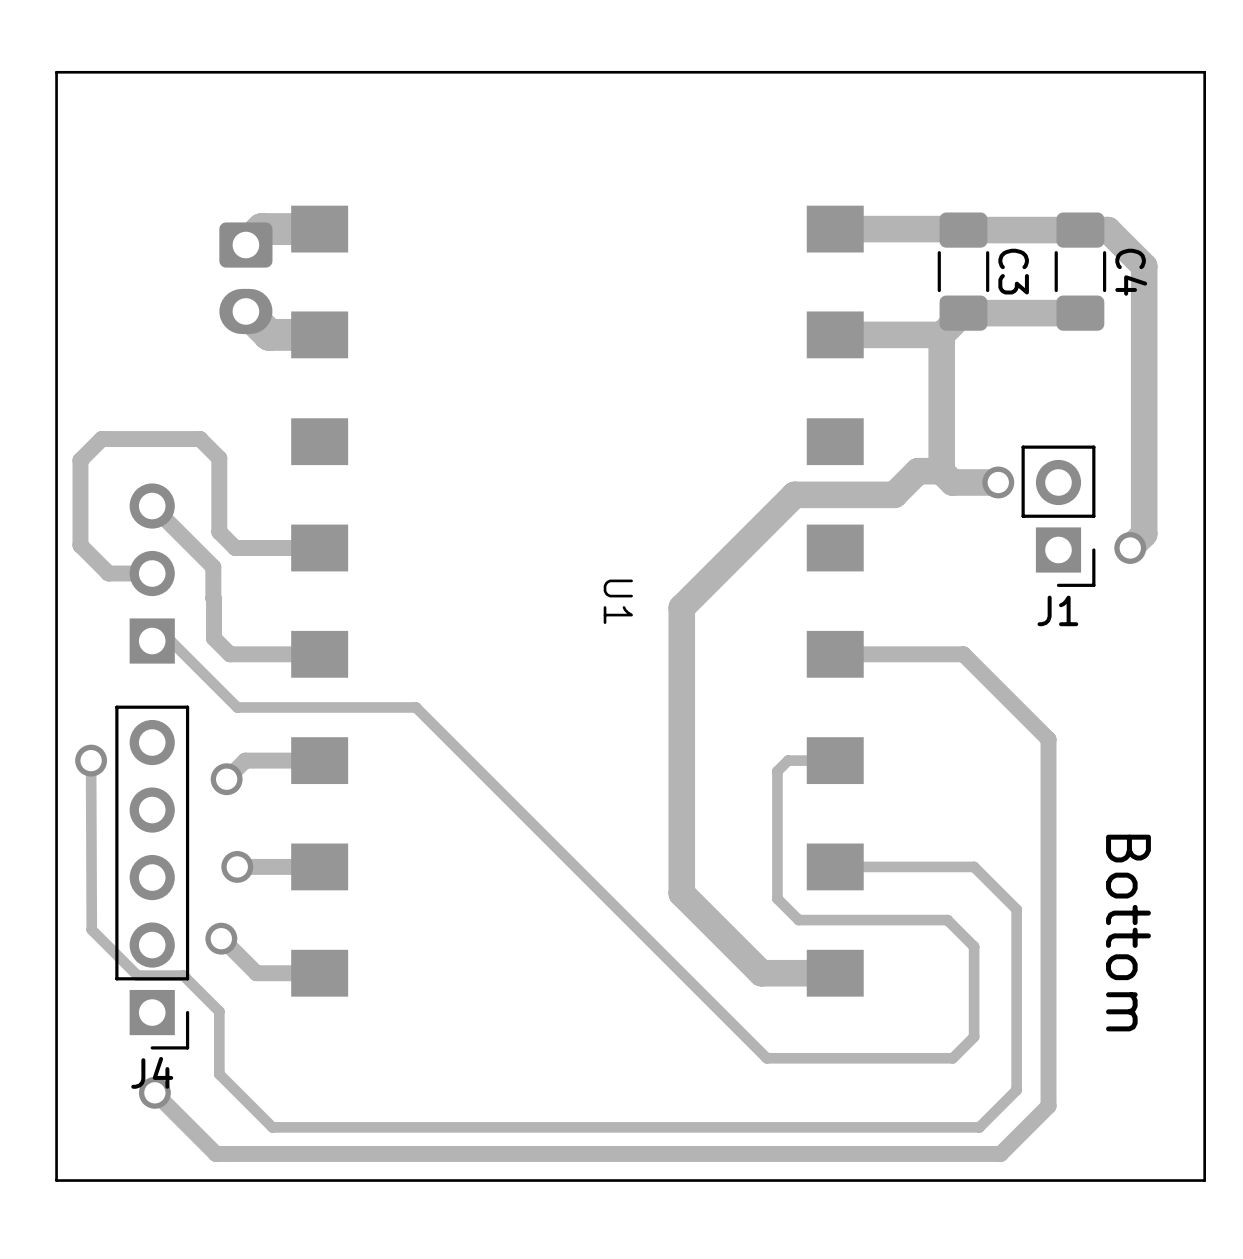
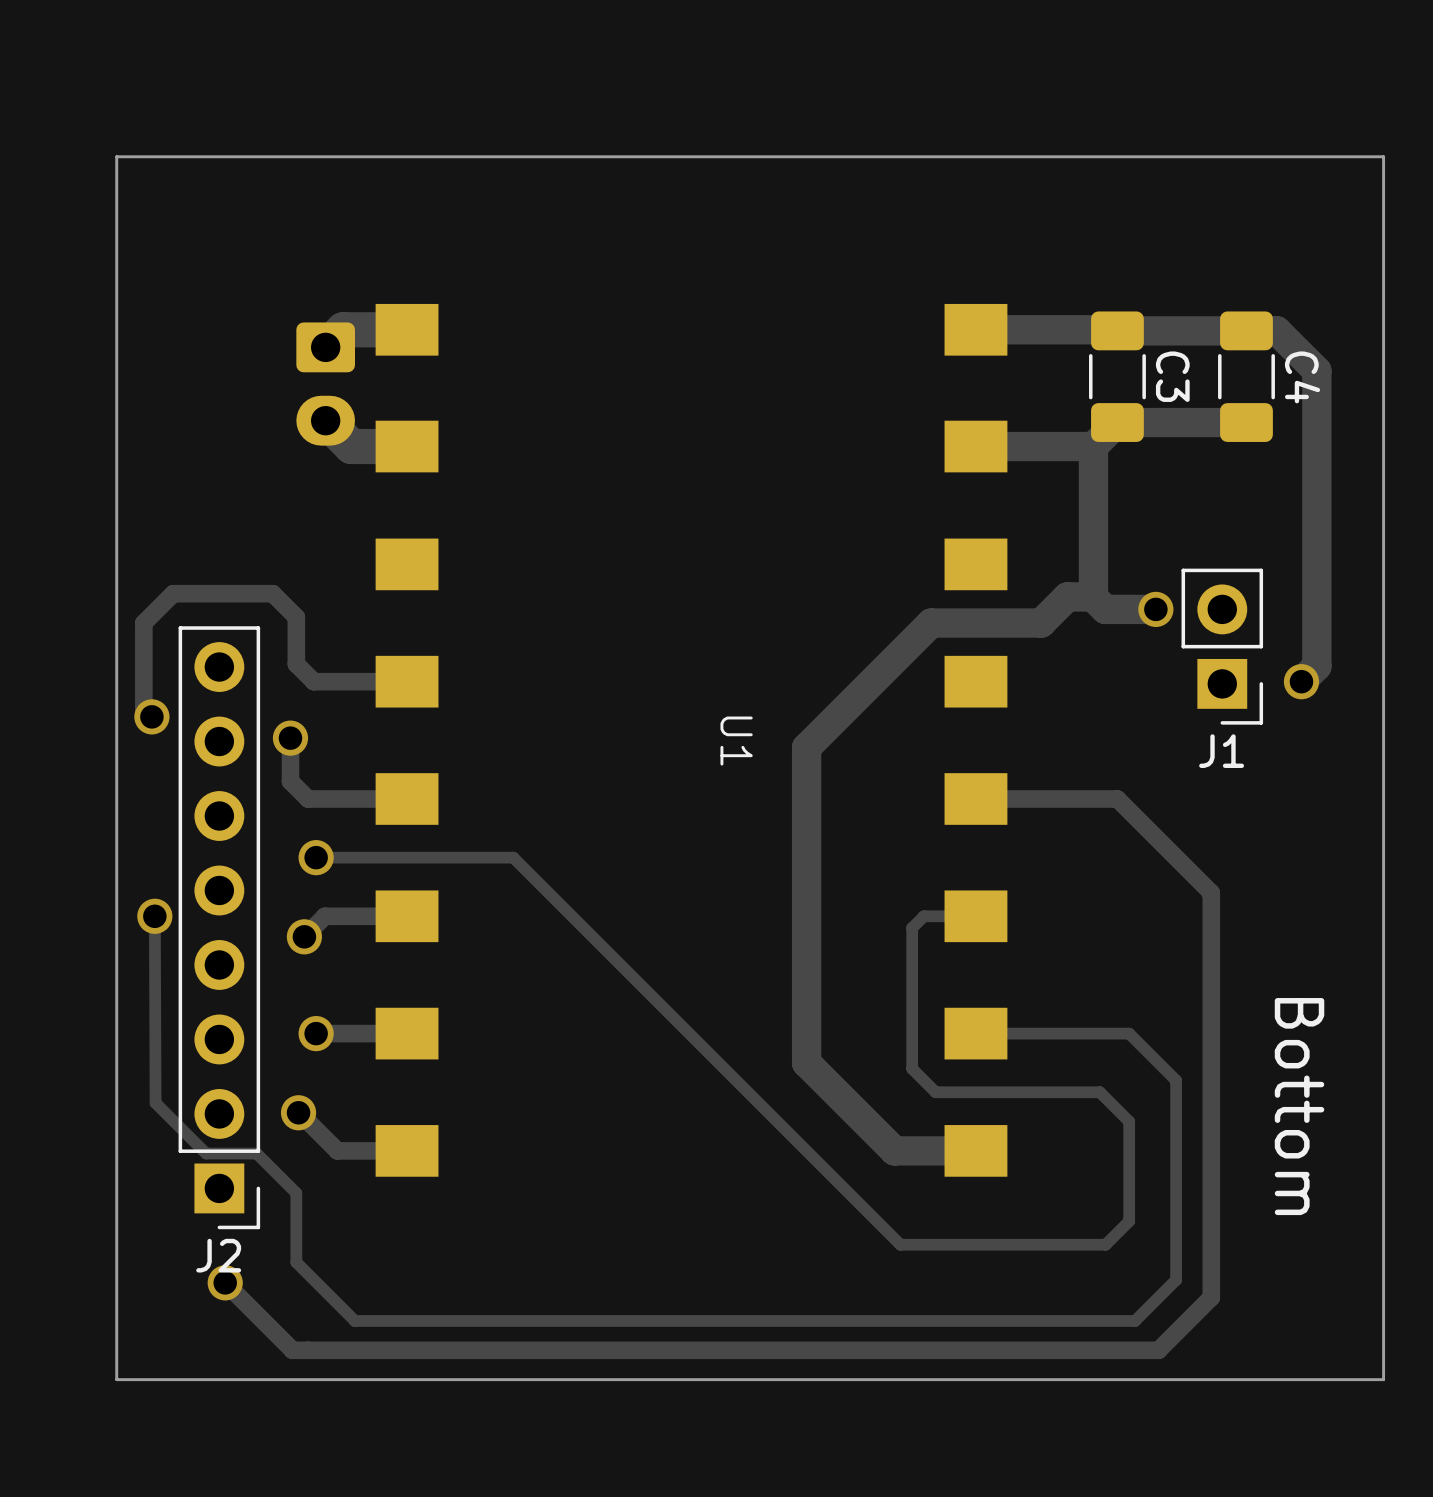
track: (219, 489) (219, 458) (200, 439) (101, 439) (80, 460) (80, 545) (108, 573) (152, 573) -> (296, 617) (272, 593) (173, 593) (143, 623) (143, 708) (151, 716)
track: (152, 506) (213, 567) (213, 598) -> none
part: (152, 573) -> none
via: none -> (151, 716)
via: none -> (290, 738)
track: (152, 641) (170, 641) (237, 707) -> none
via: none -> (316, 857)
J2: none -> (219, 927)
J4: (152, 877) -> none

